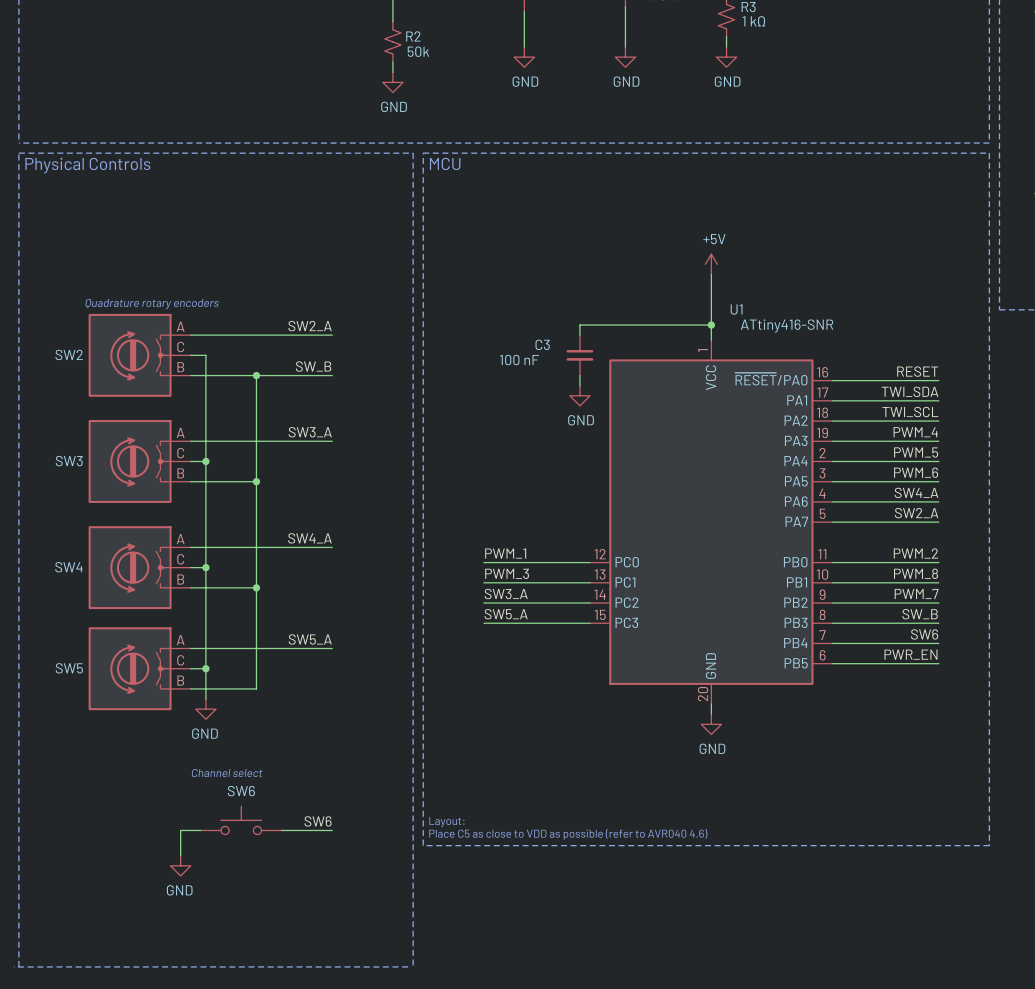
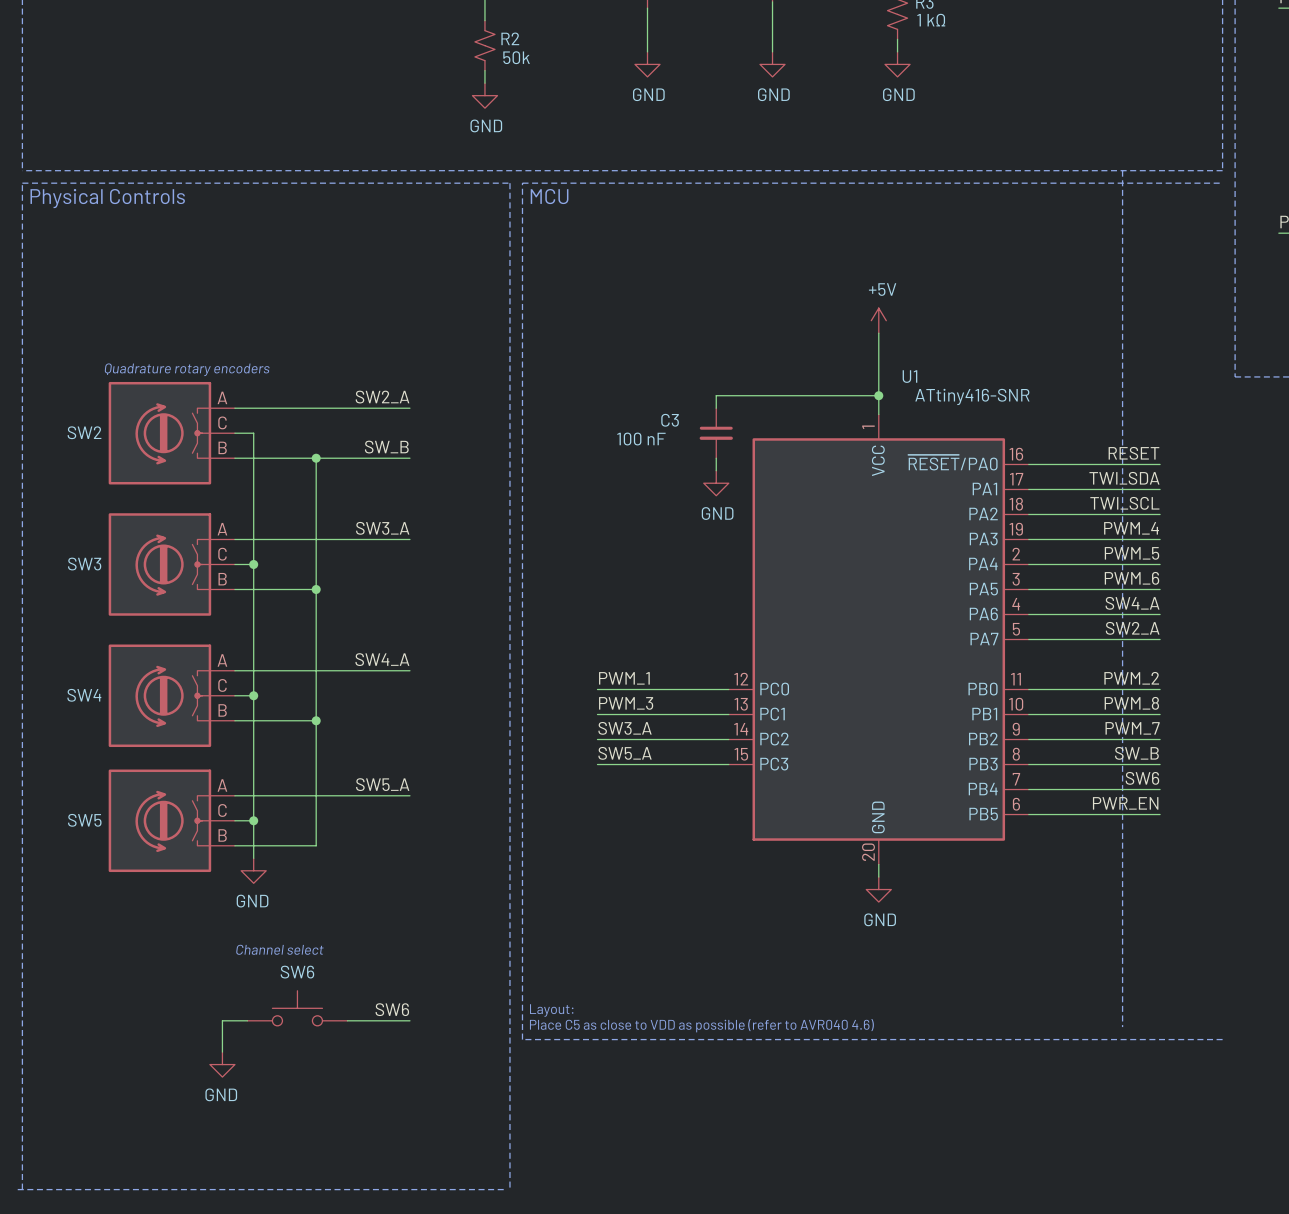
line: (989, 153) (989, 845) -> (1122, 170) (1122, 1027)

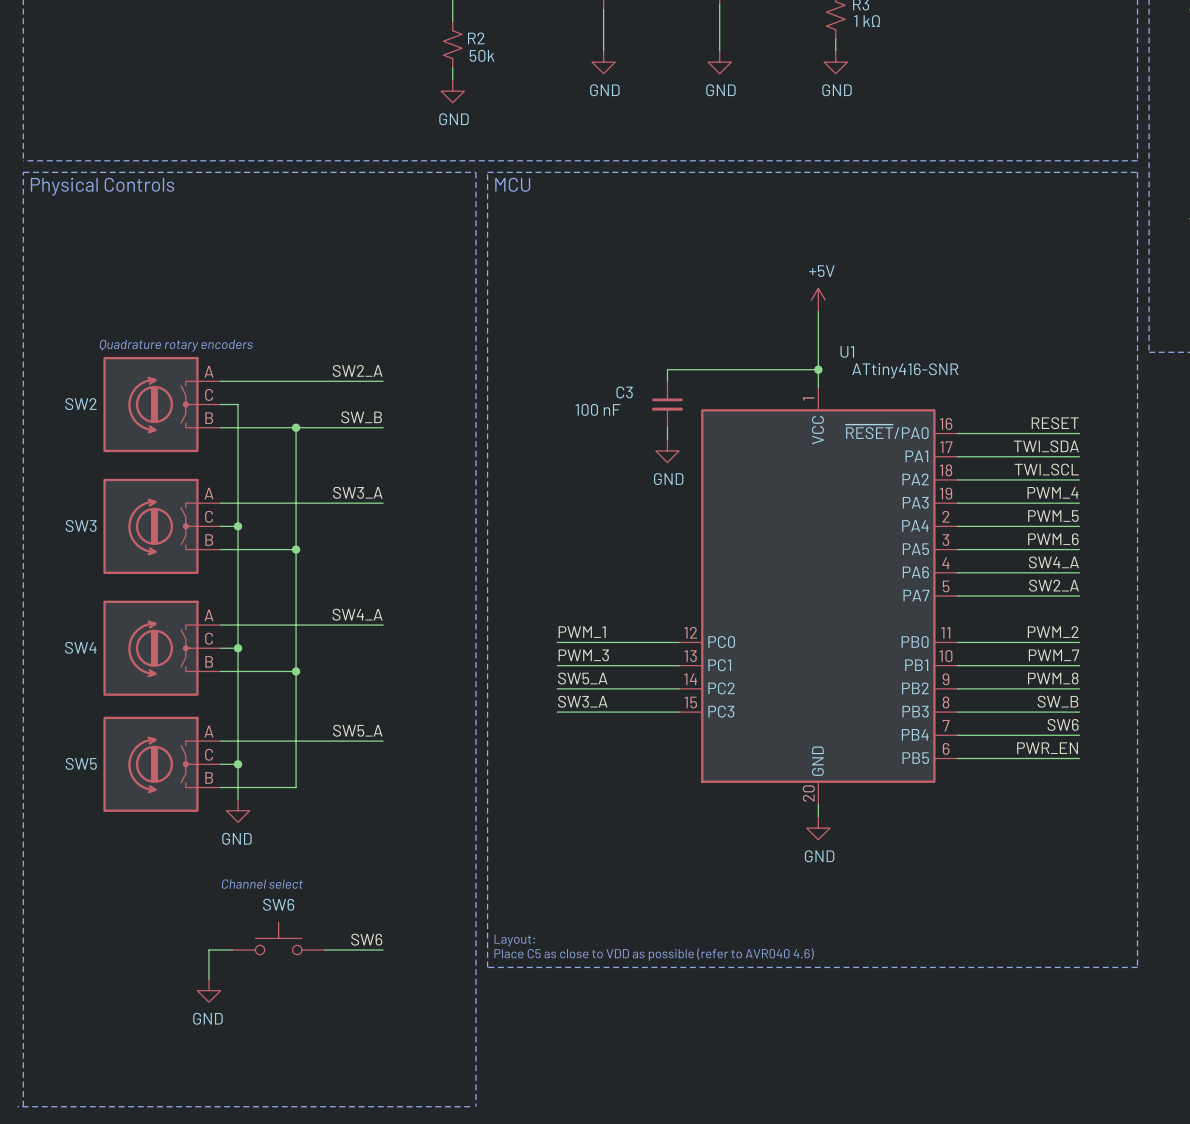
line: (1122, 170) (1122, 1027) -> (1137, 172) (1137, 967)
label: PWM_8 (1131, 703) -> PWM_7 (1053, 655)
label: SW3_A (625, 728) -> SW5_A (582, 678)
label: PWM_7 (1132, 728) -> PWM_8 (1053, 678)
label: SW5_A (625, 753) -> SW3_A (582, 701)

